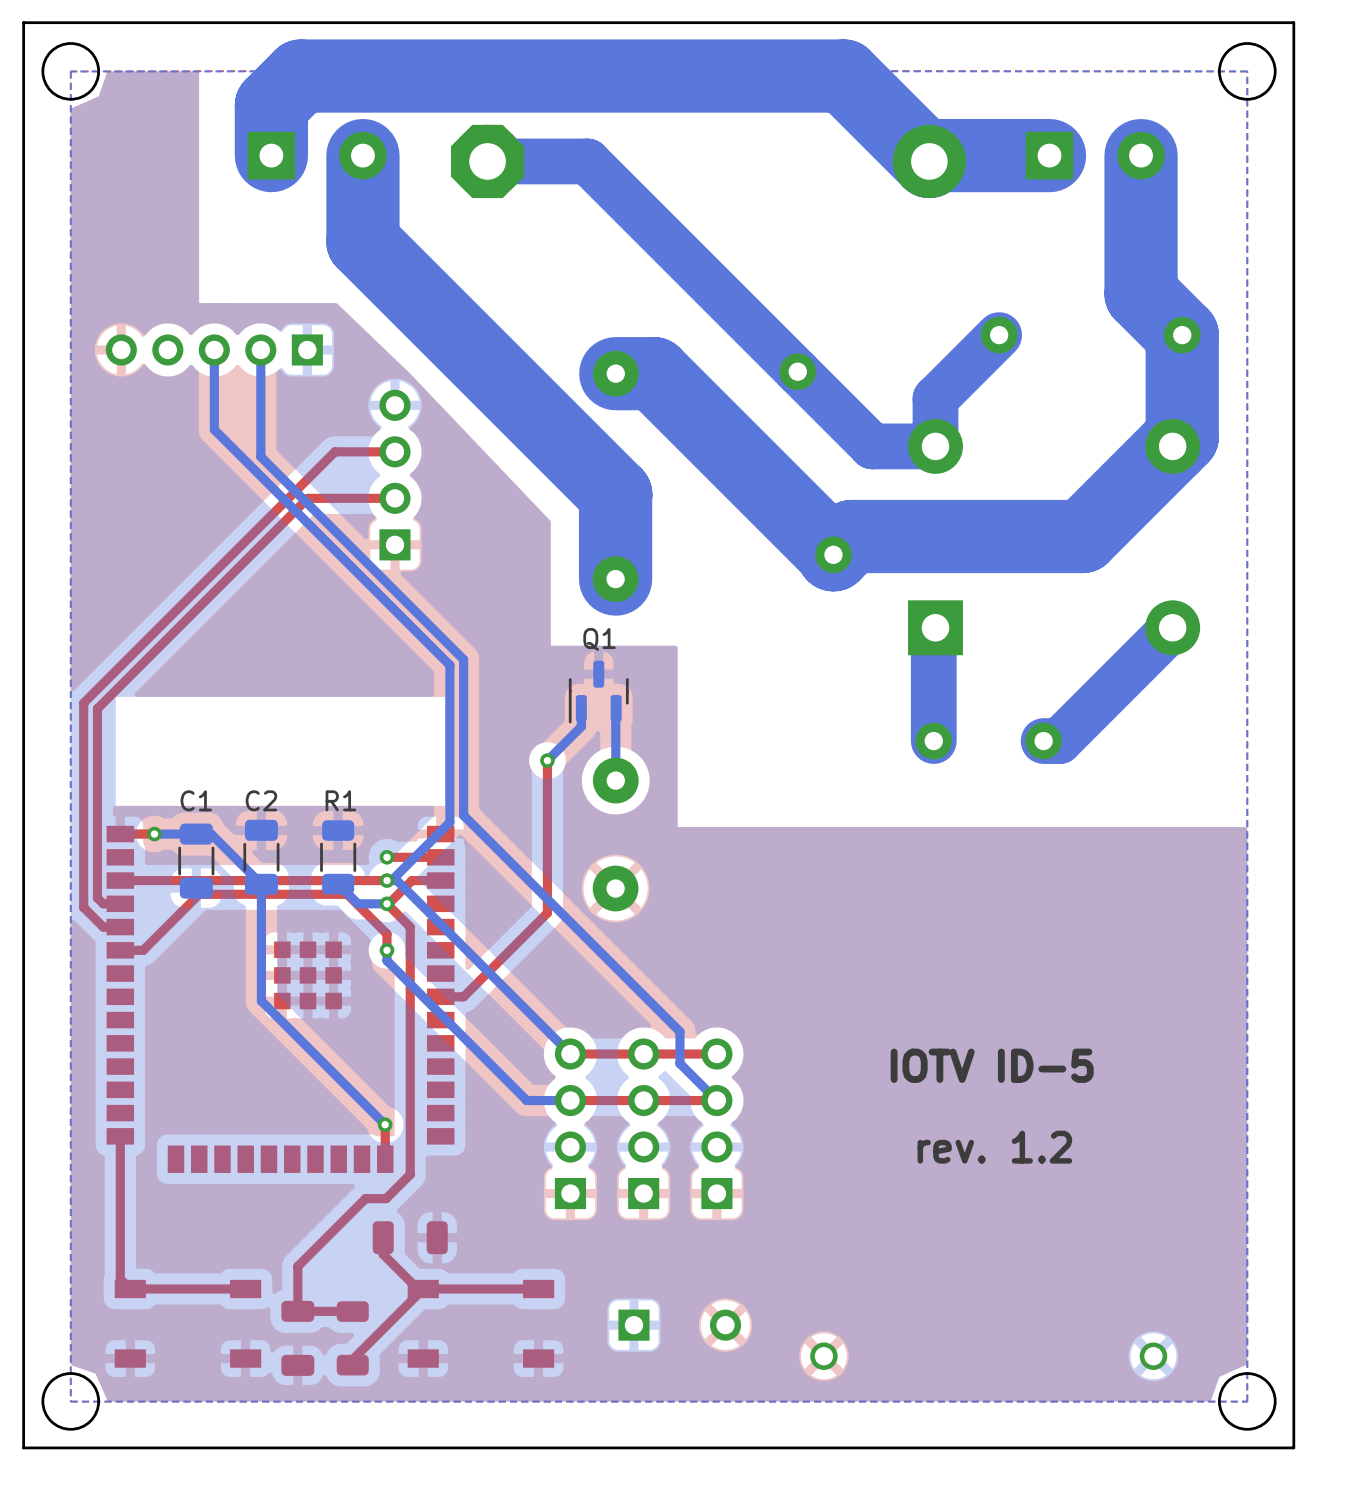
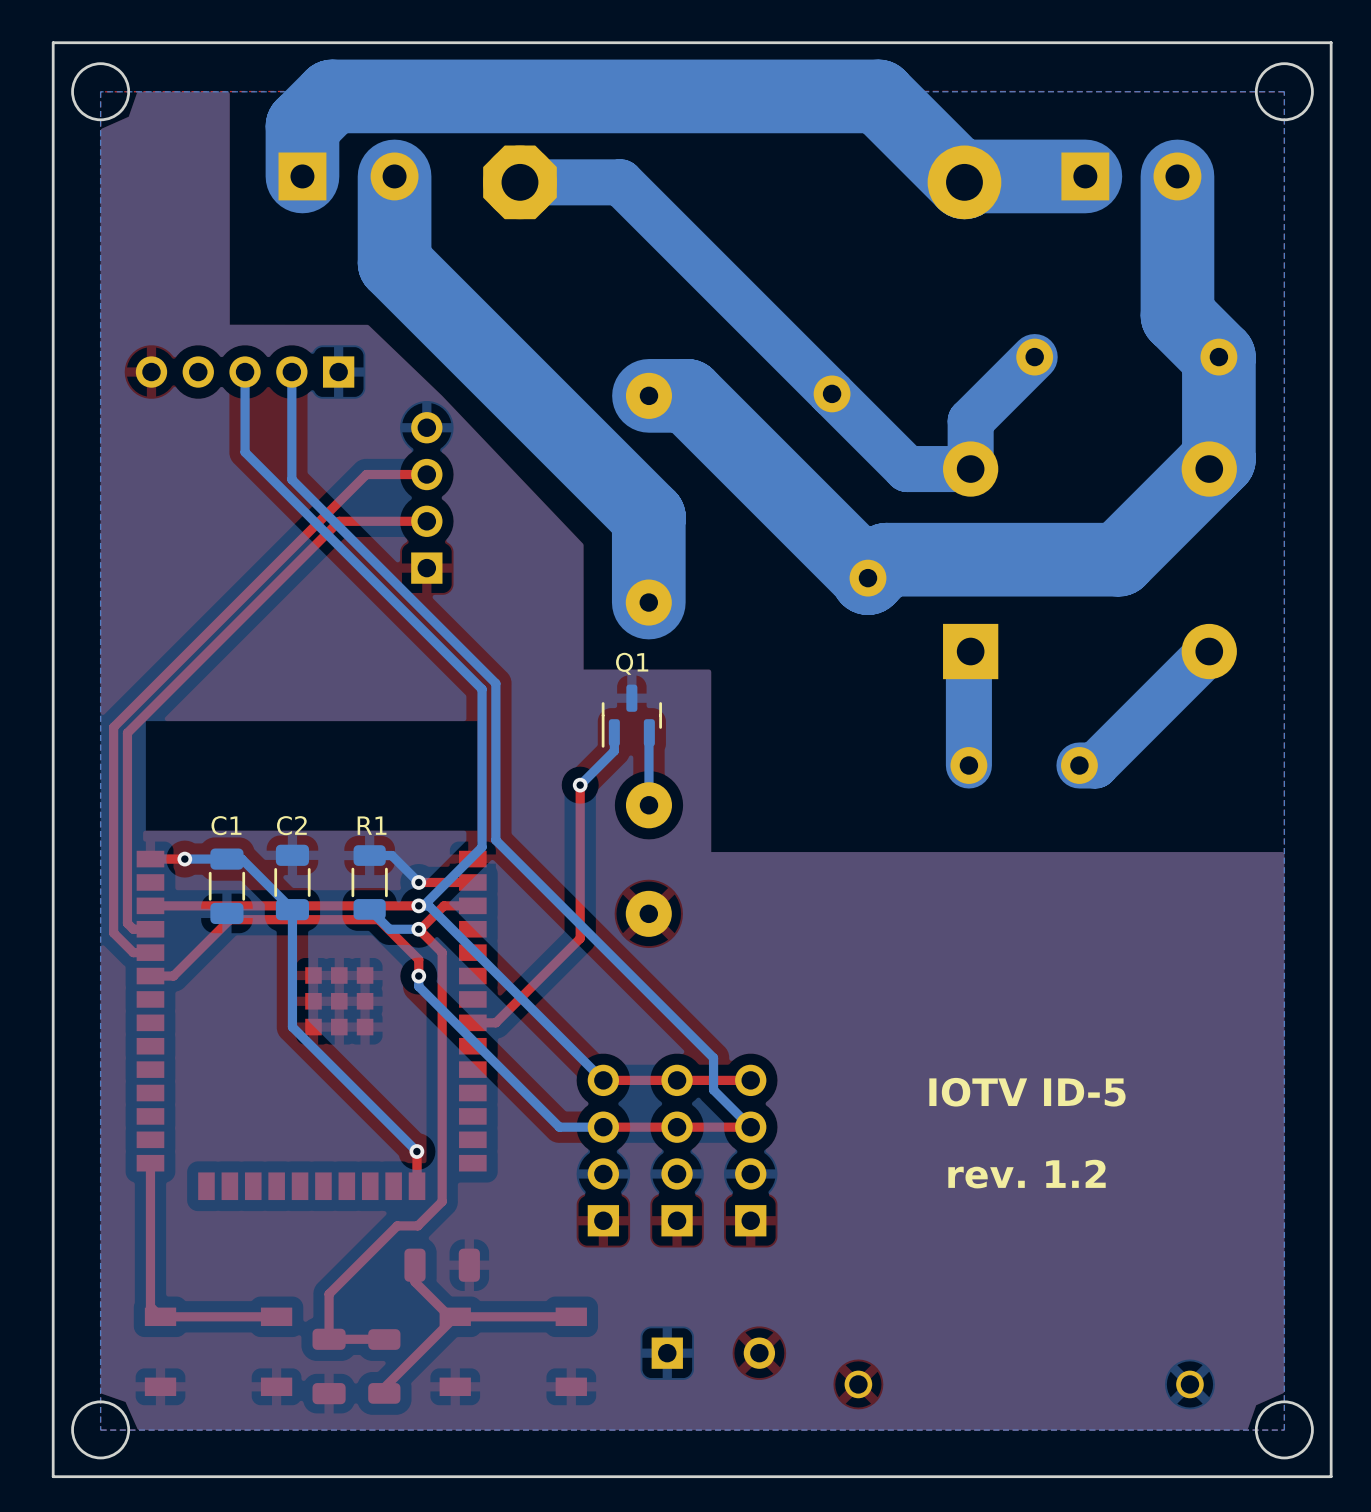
bottom track: none -> (369, 855) (391, 855) (418, 882)

